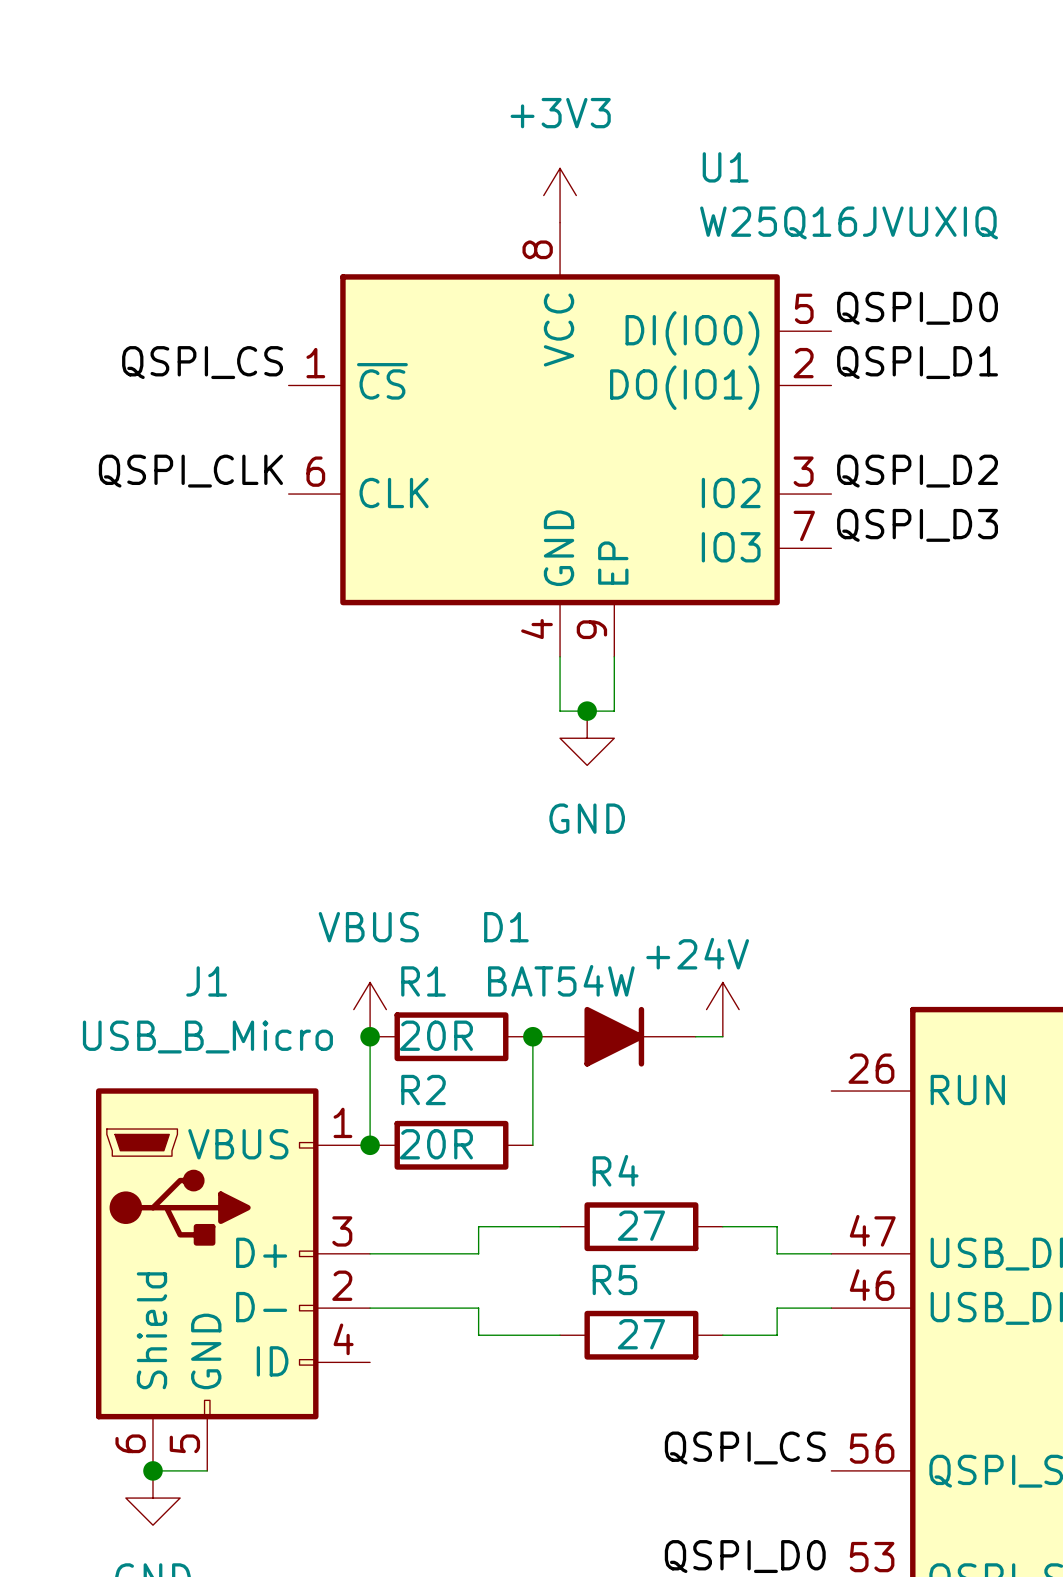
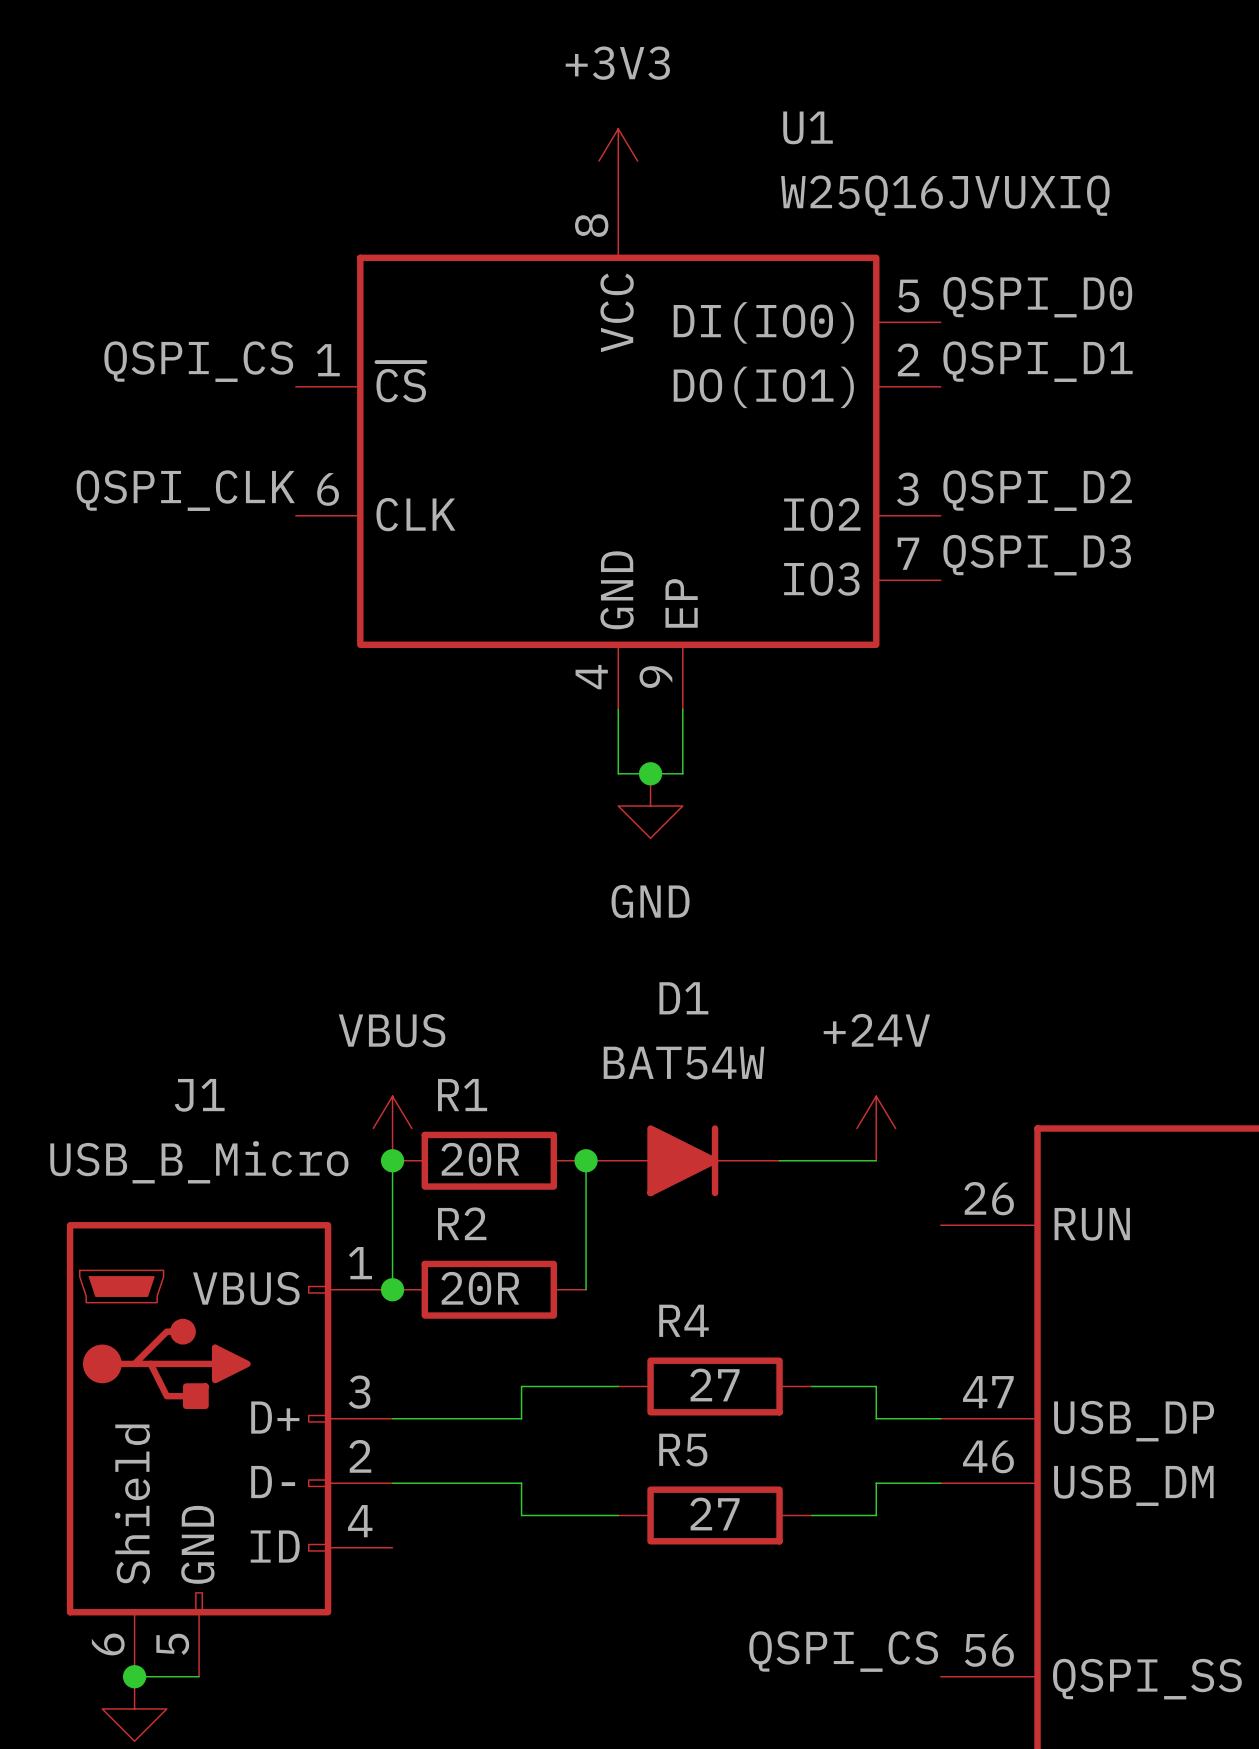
D1 name position: D1 (506, 927) -> D1 (683, 998)
power symbol text position: +24V (697, 953) -> +24V (876, 1030)
D1 value position: BAT54W (561, 980) -> BAT54W (684, 1063)
power symbol position: +24V (722, 1009) -> +24V (876, 1128)
wire: none -> (811, 1160) (876, 1160)

